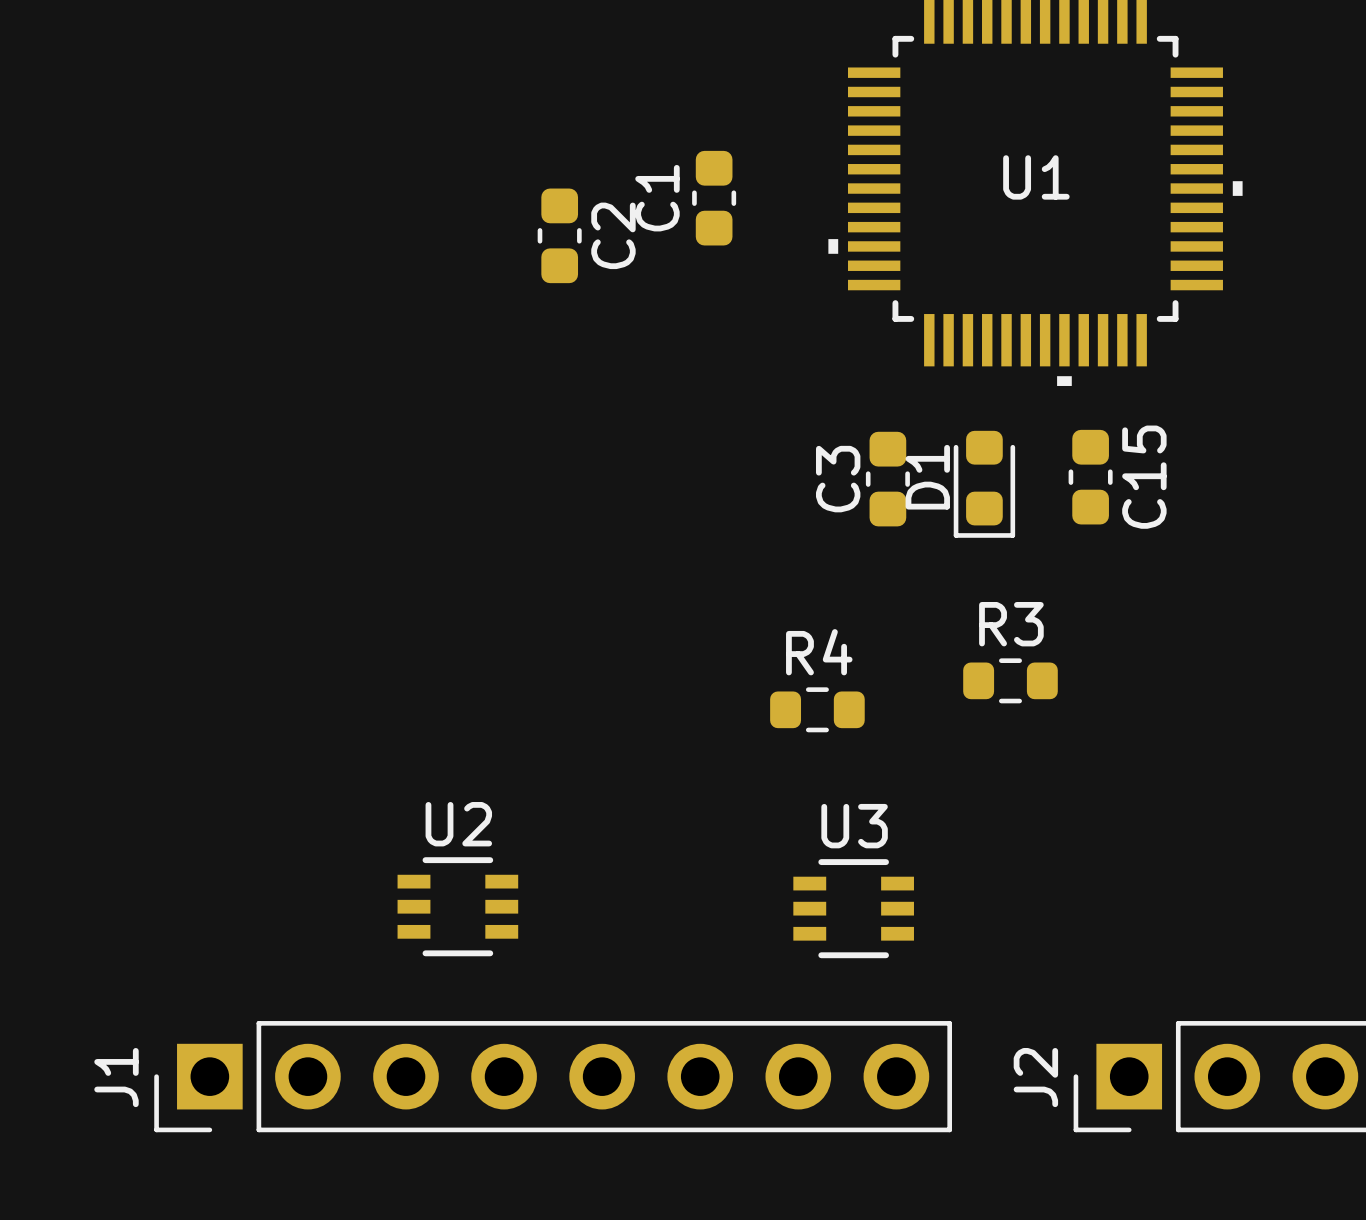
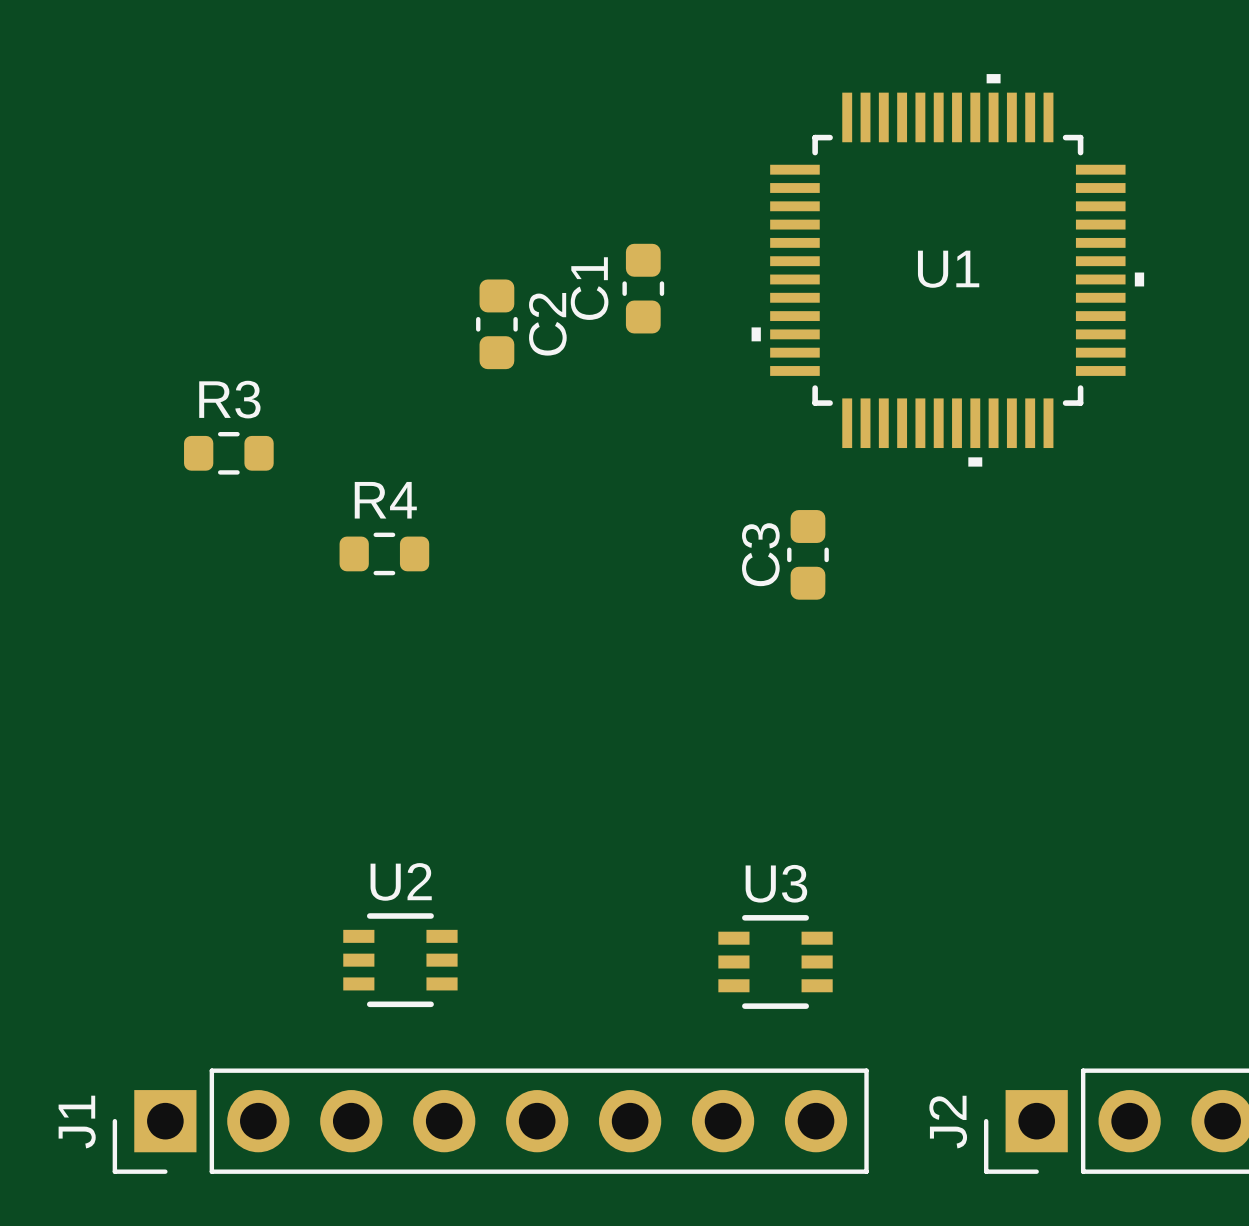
C15: (1090, 477) -> none
D1: (984, 484) -> none
R3 position: (1010, 680) -> (228, 453)
R4 position: (817, 709) -> (384, 553)

